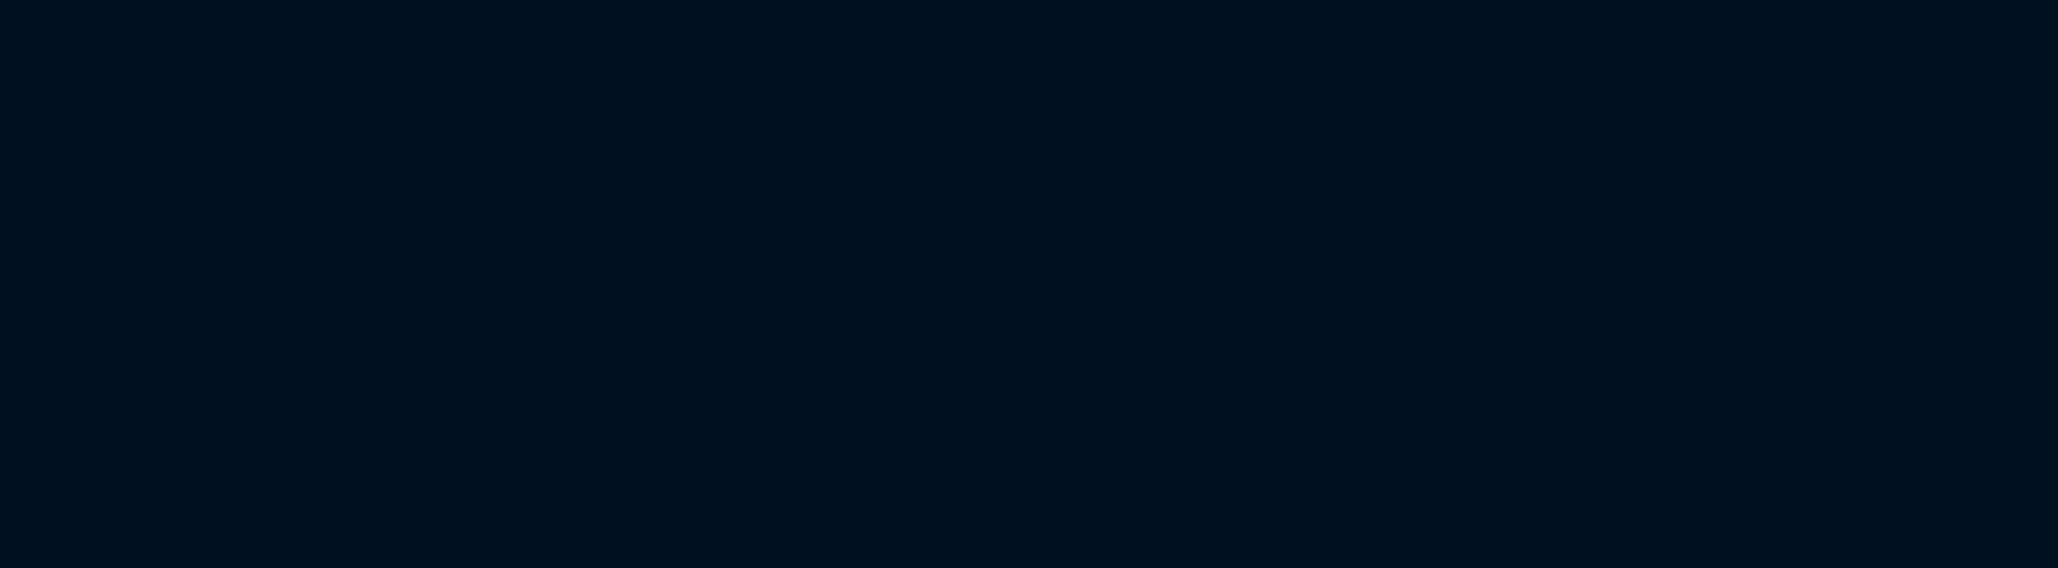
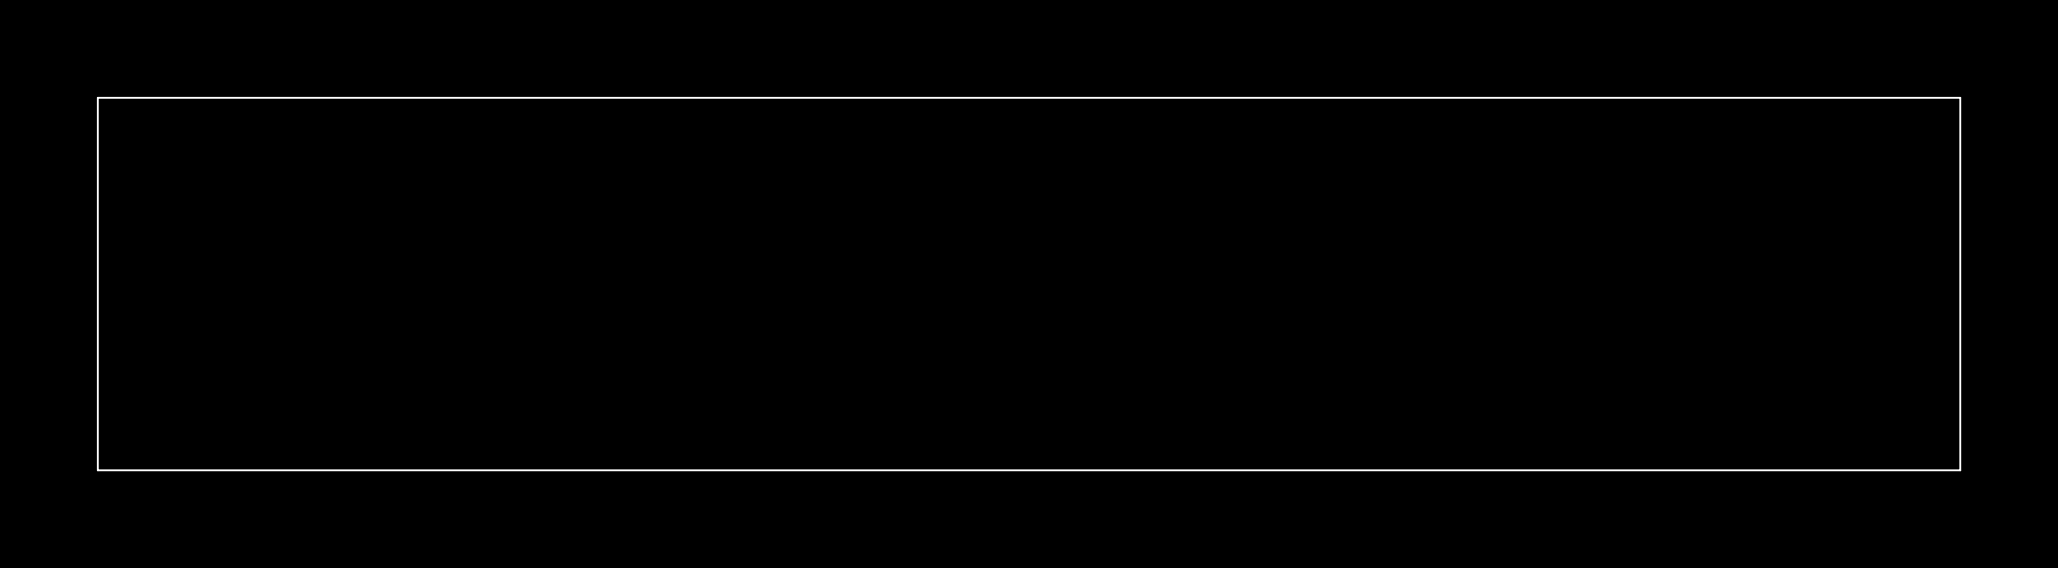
board edge: none -> (97, 97) (1960, 97) (1960, 470) (97, 470) (97, 97)

